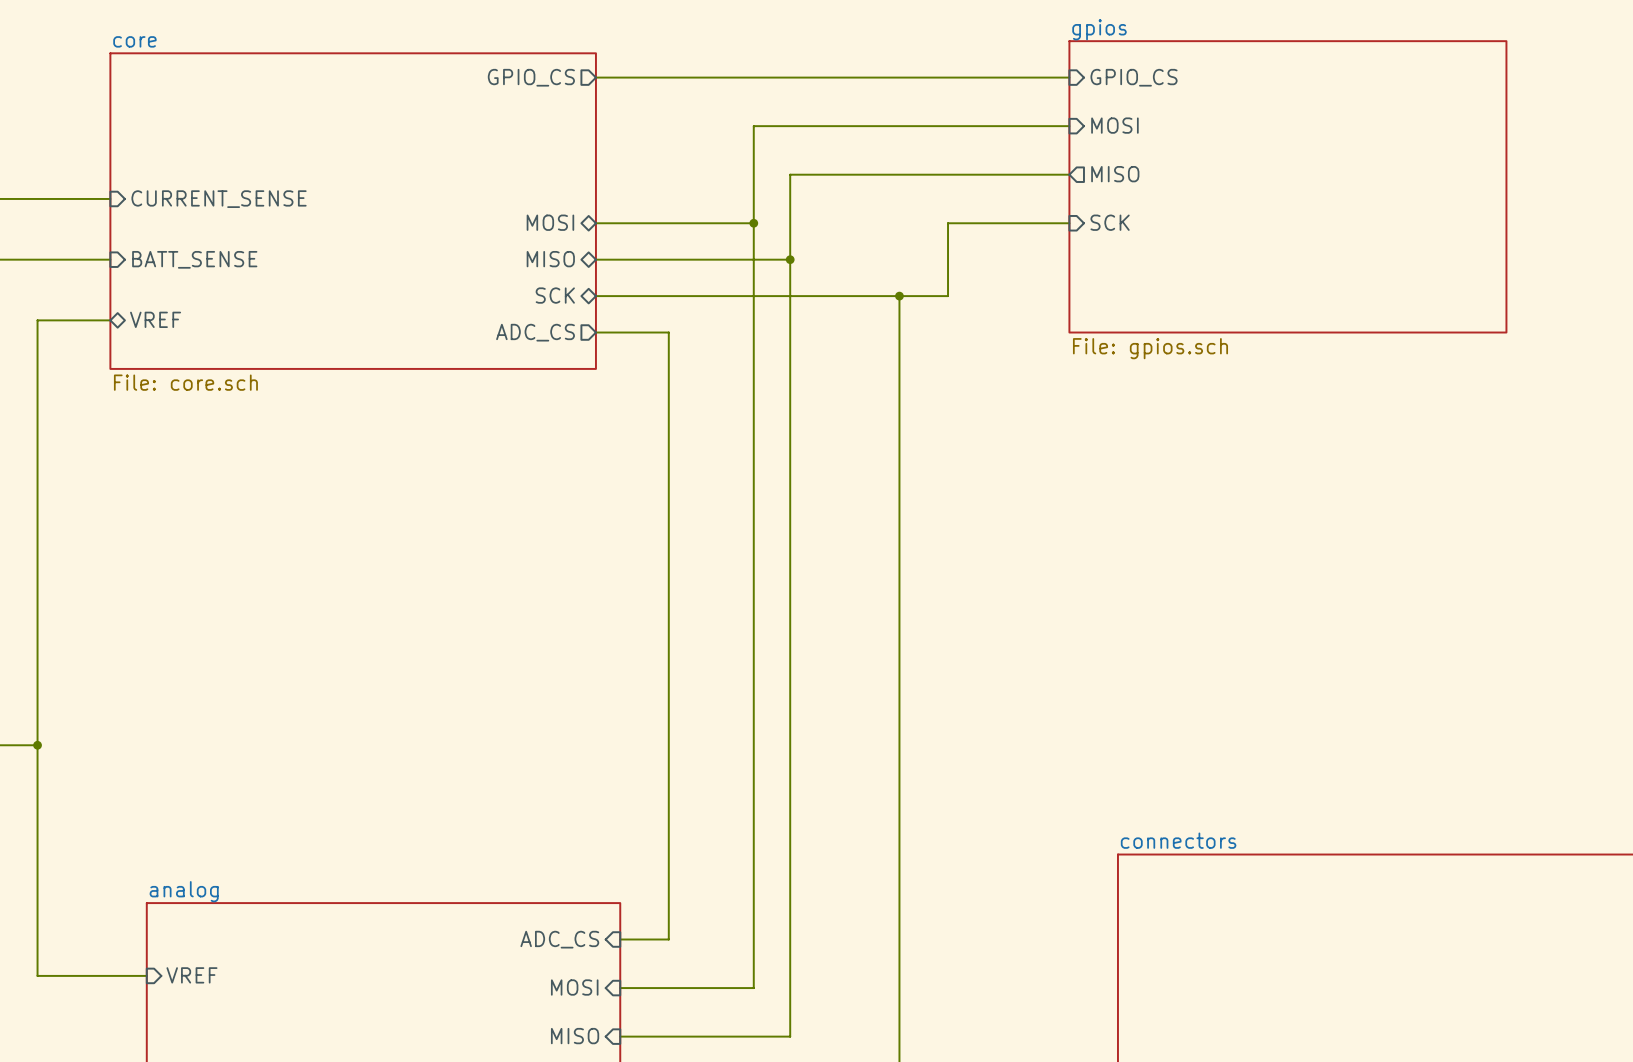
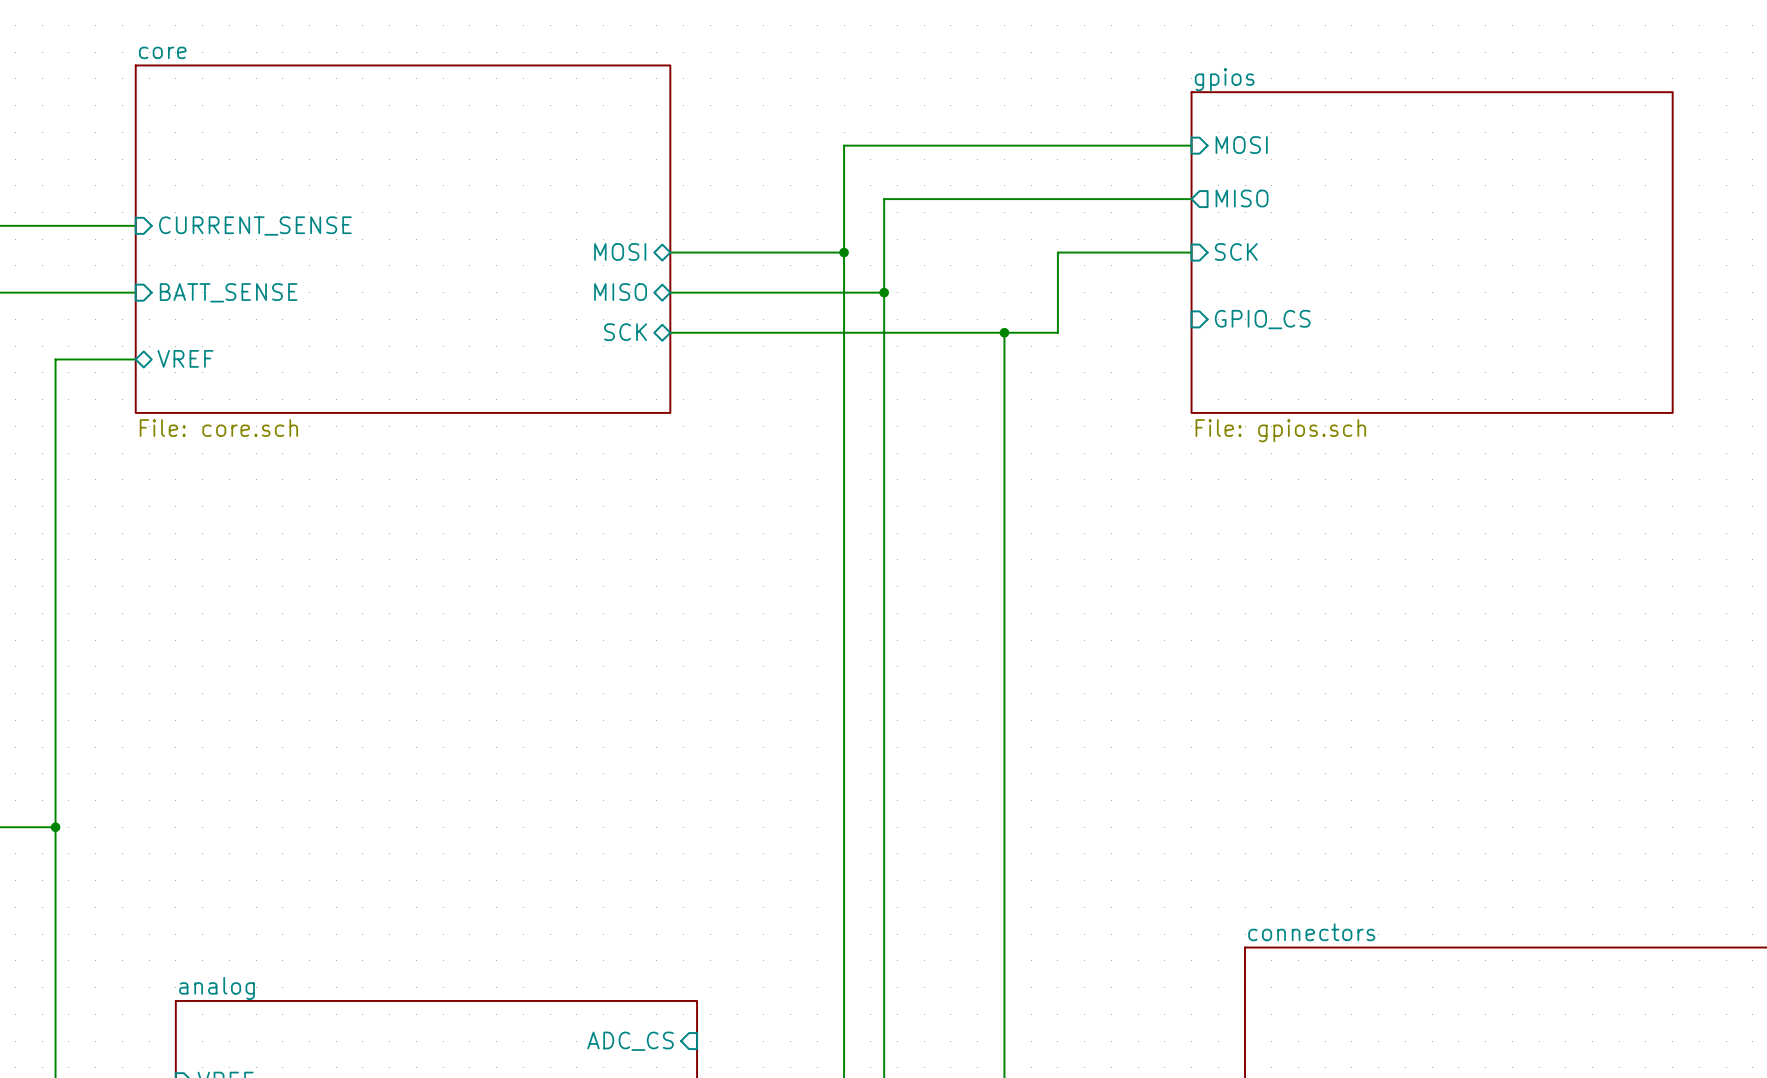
sheet pin: GPIO_CS (531, 77) -> none
wire: (595, 77) (1069, 77) -> none
sheet pin position: GPIO_CS (1134, 77) -> GPIO_CS (1262, 319)
sheet gpios position: (1287, 186) -> (1432, 252)
sheet pin: ADC_CS (535, 332) -> none
wire: (595, 332) (668, 332) (668, 939) (620, 939) -> none

